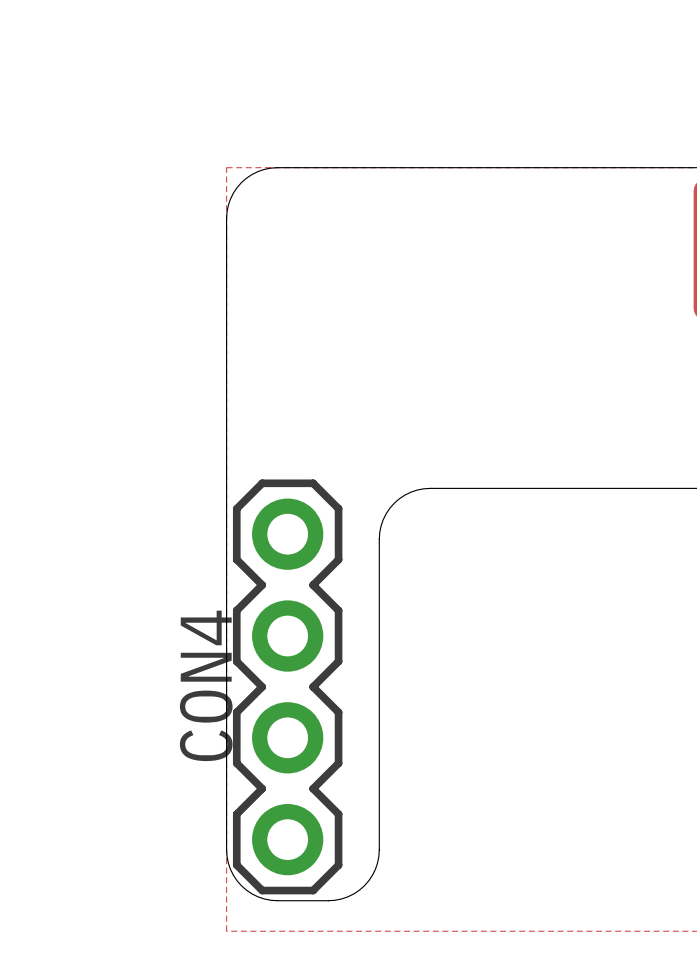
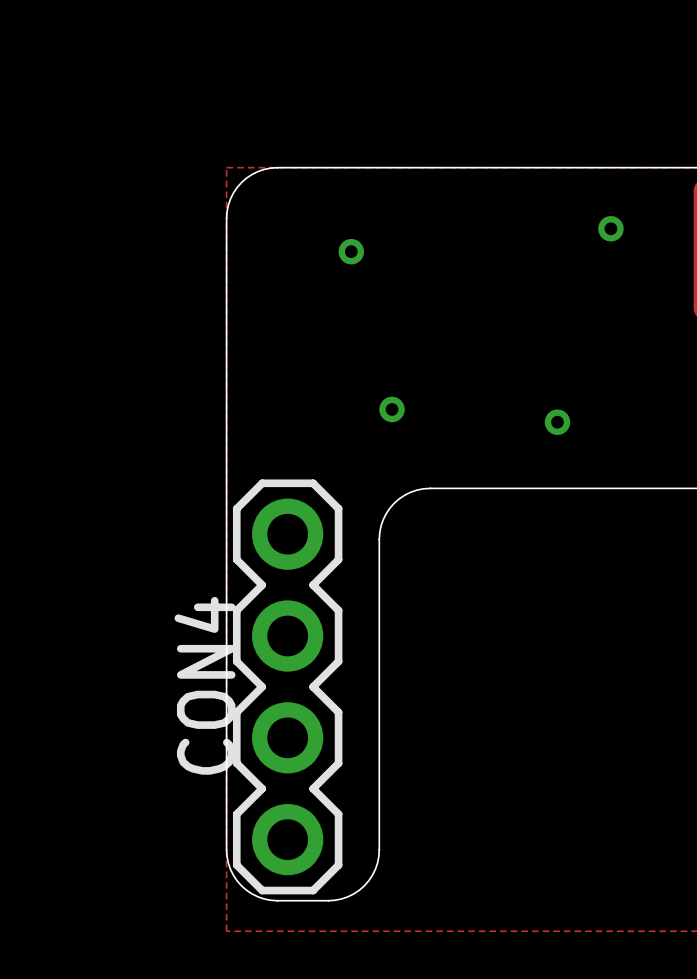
via: none -> (610, 228)
via: none -> (351, 251)
via: none -> (392, 409)
via: none -> (557, 422)

